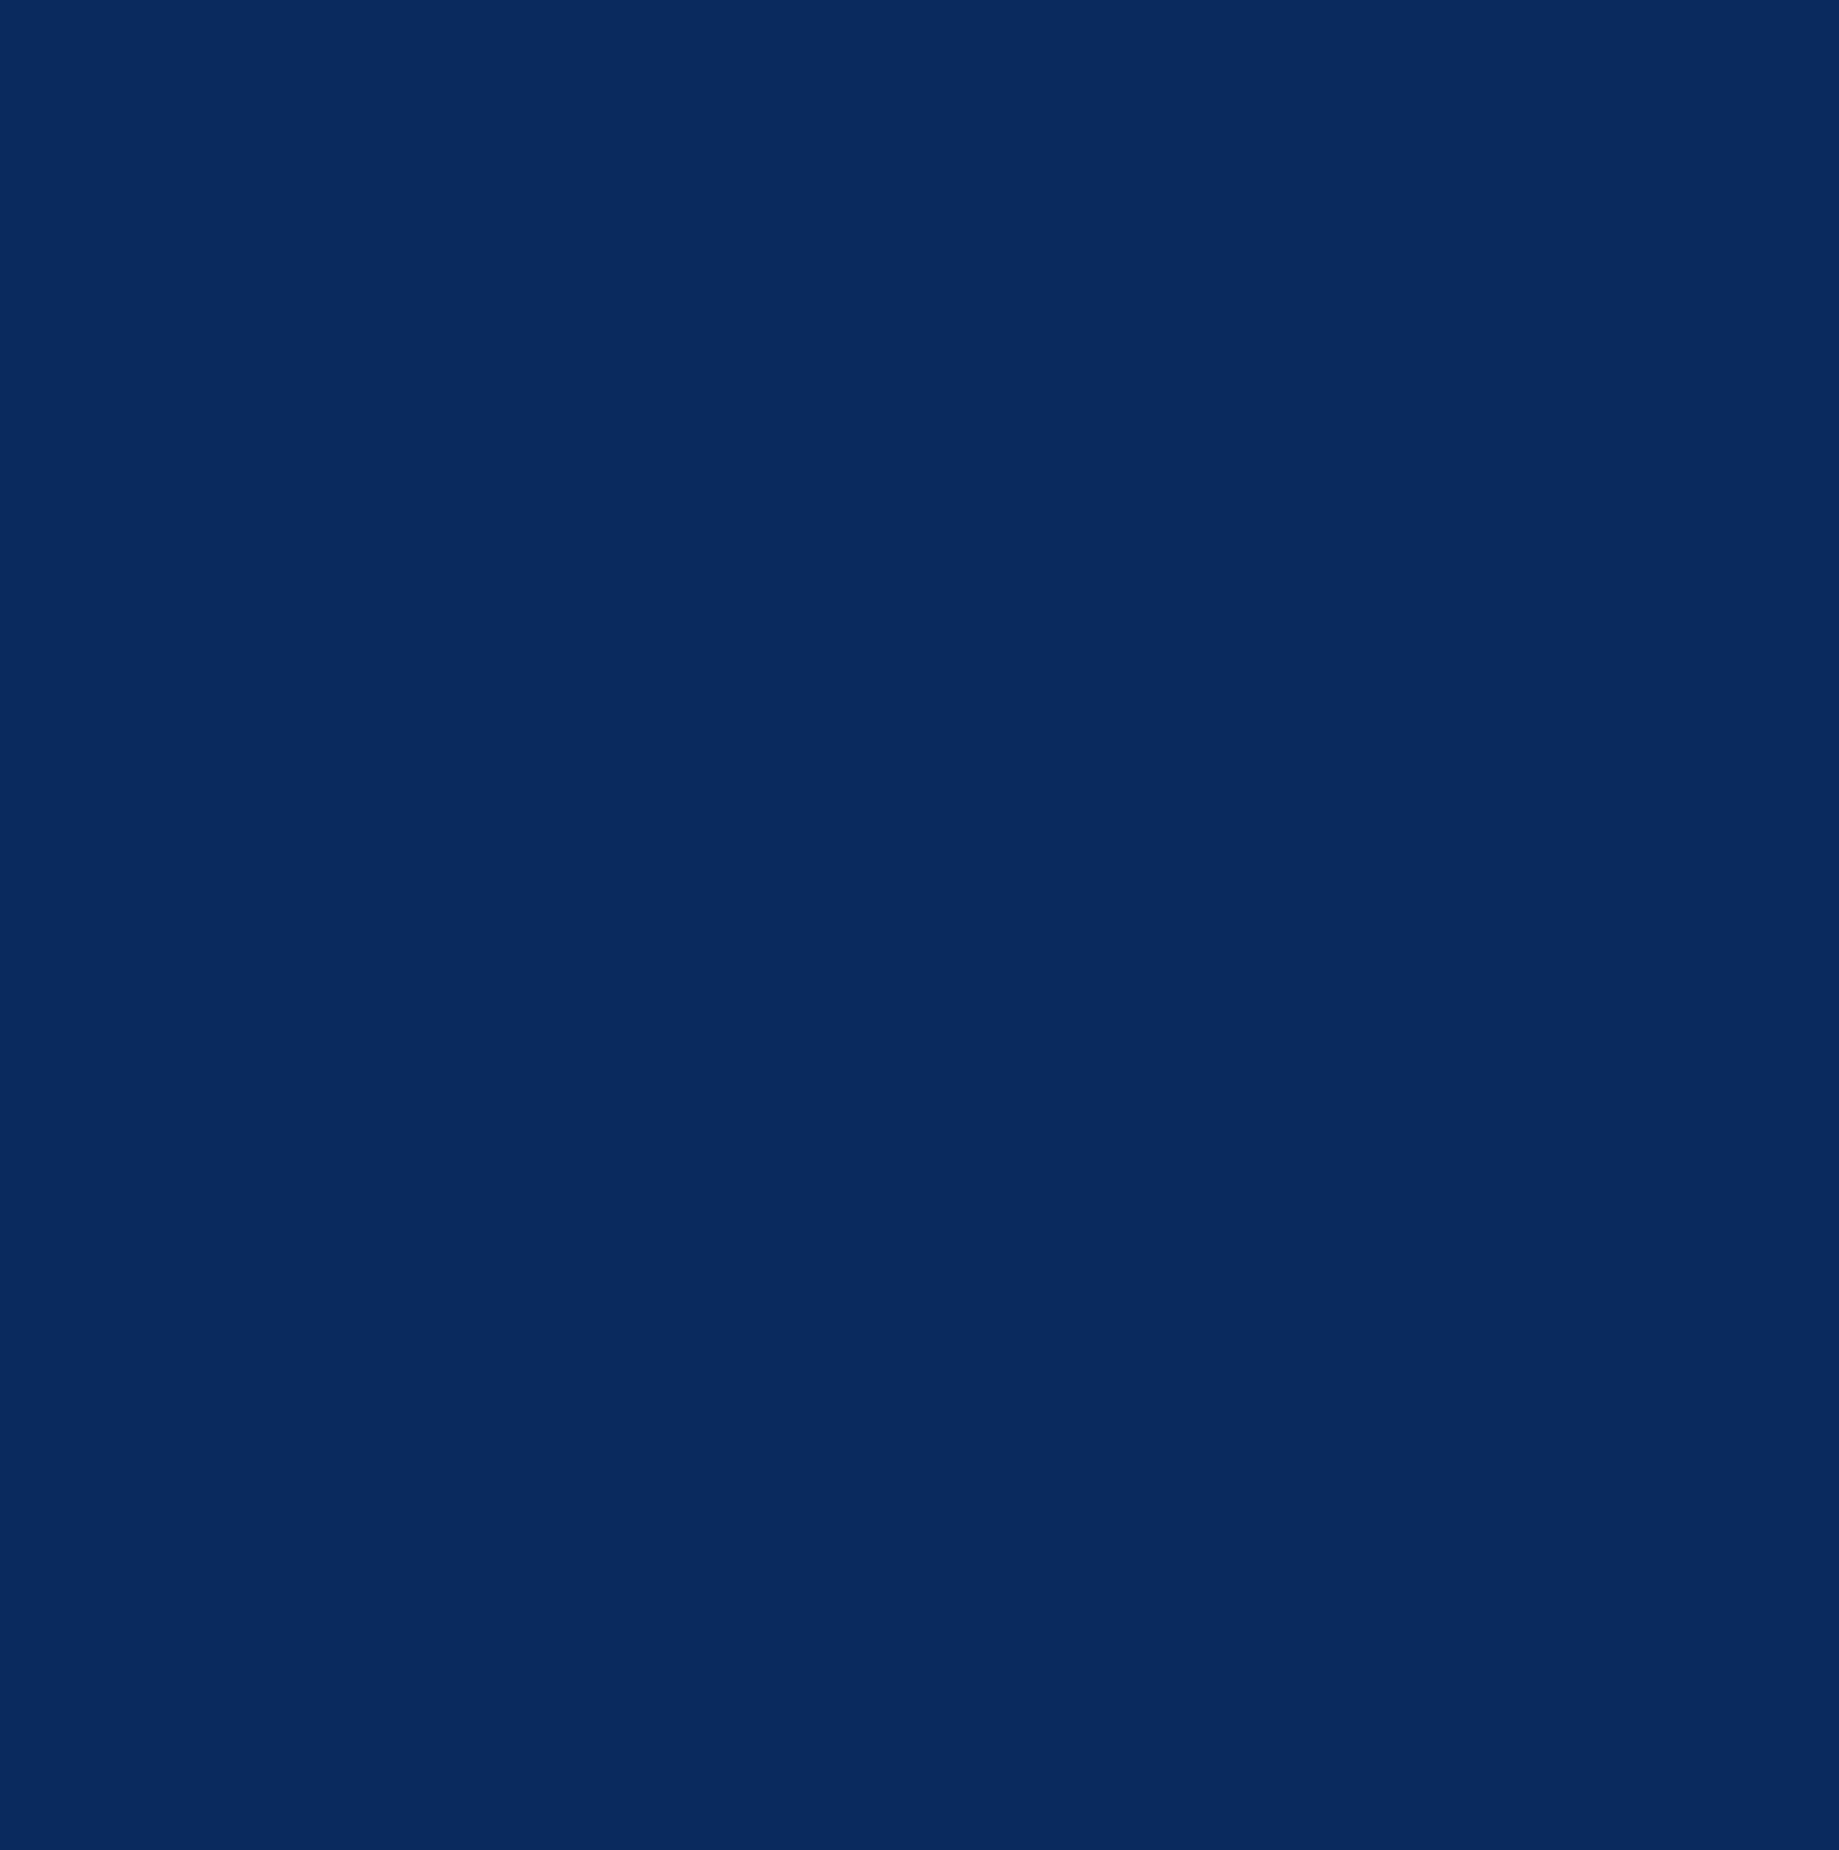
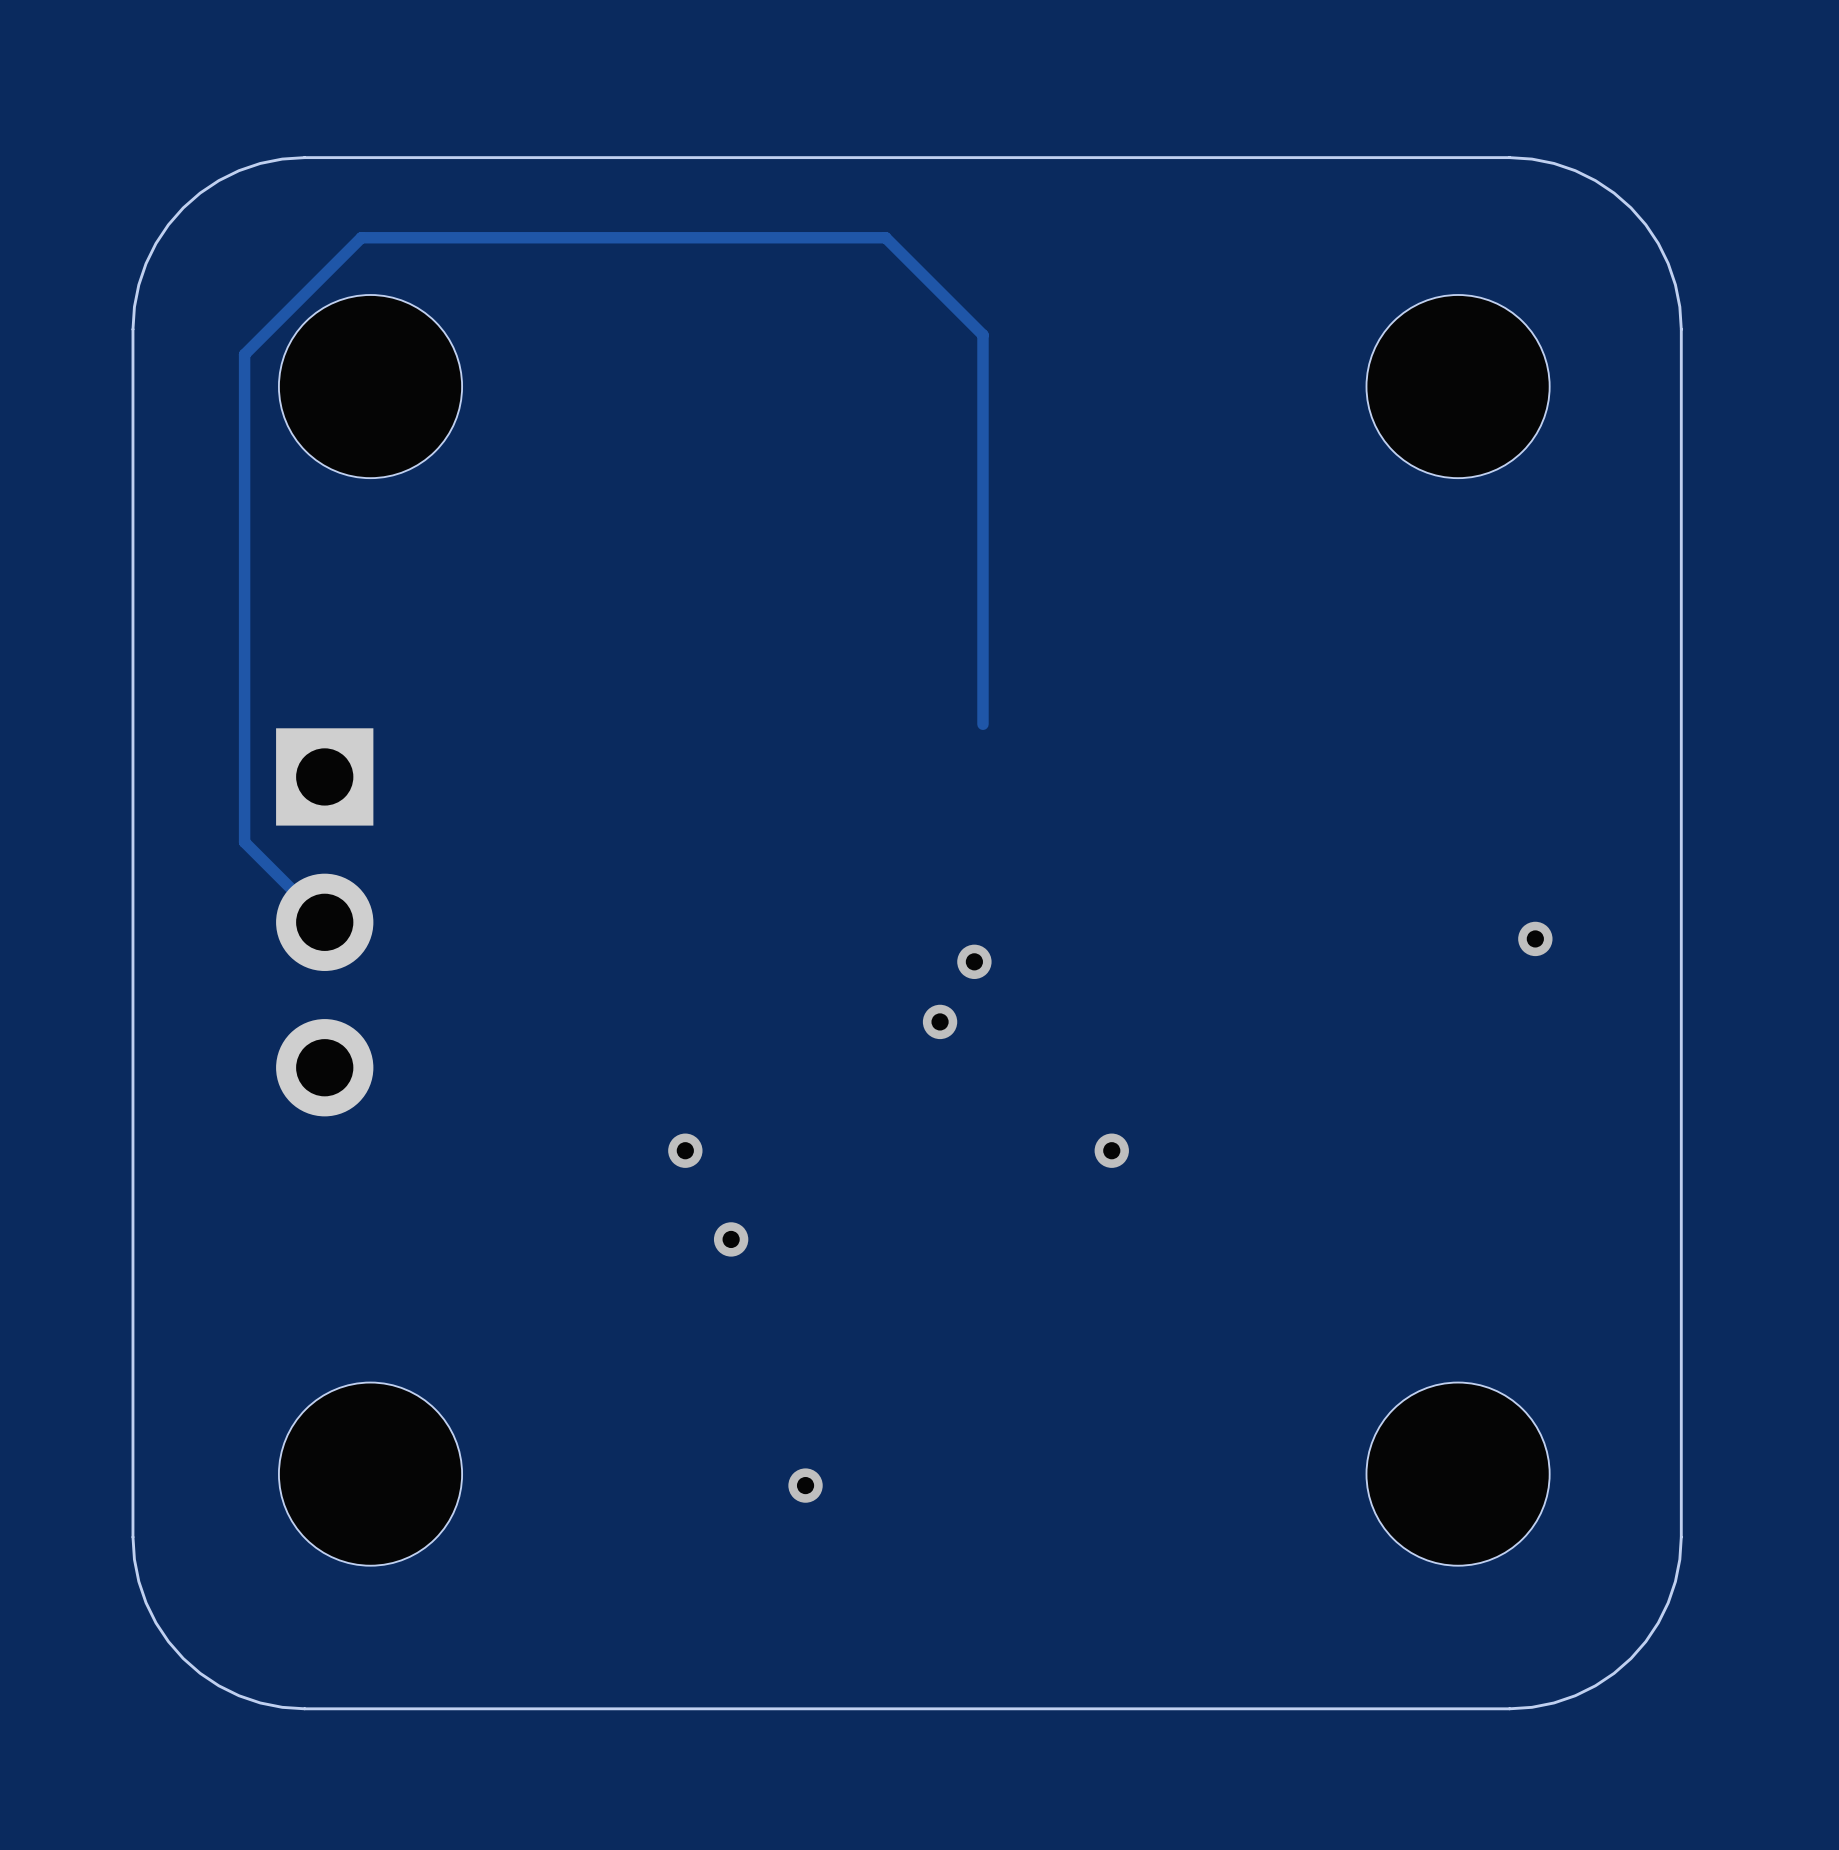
board edge: none -> (1509, 157) (304, 157) (282, 159) (238, 170) (200, 193) (168, 224) (146, 263) (138, 284) (132, 329) (132, 1537) (138, 1581) (146, 1602) (168, 1641) (200, 1673) (238, 1695) (260, 1702) (304, 1708) (1509, 1708) (1532, 1707) (1575, 1695) (1614, 1673) (1645, 1641) (1668, 1602) (1675, 1581) (1681, 1537) (1679, 306) (1675, 284) (1658, 243) (1631, 207) (1614, 193) (1595, 180) (1554, 163) (1509, 157)
part: none -> (370, 386)
part: none -> (1458, 386)
track: none -> (982, 724) (982, 335) (885, 237) (361, 237) (244, 354) (244, 842) (324, 922)
part: none -> (324, 922)
via: none -> (1535, 938)
via: none -> (974, 961)
via: none -> (940, 1021)
via: none -> (685, 1150)
via: none -> (1111, 1150)
via: none -> (731, 1239)
part: none -> (370, 1474)
part: none -> (1458, 1474)
via: none -> (805, 1485)

